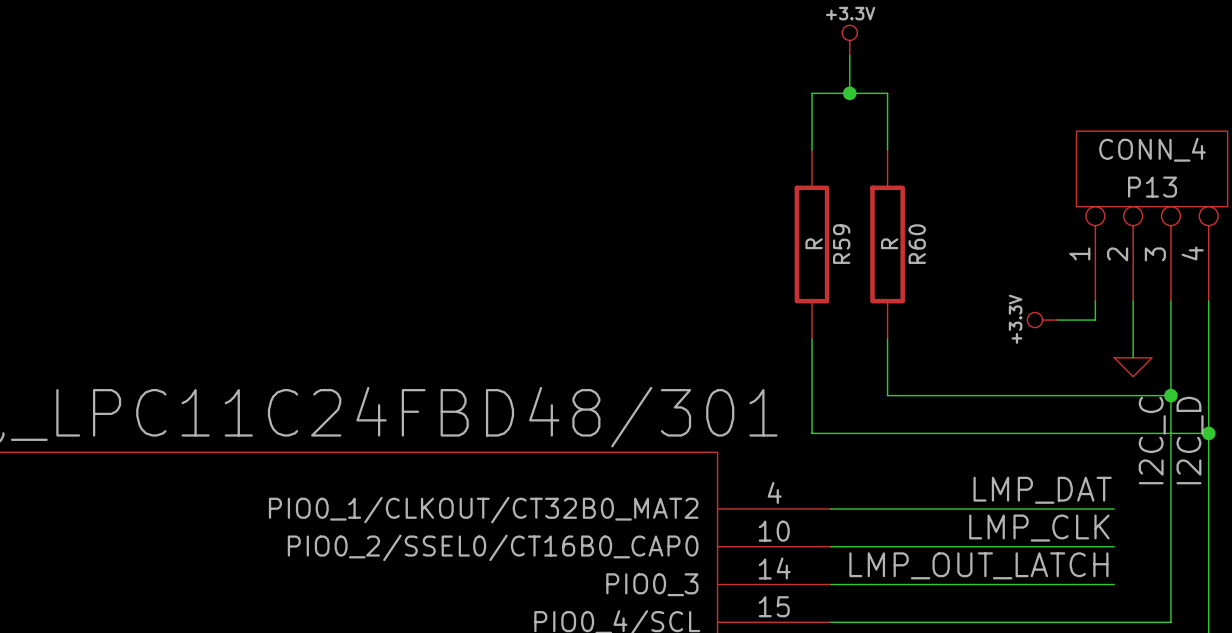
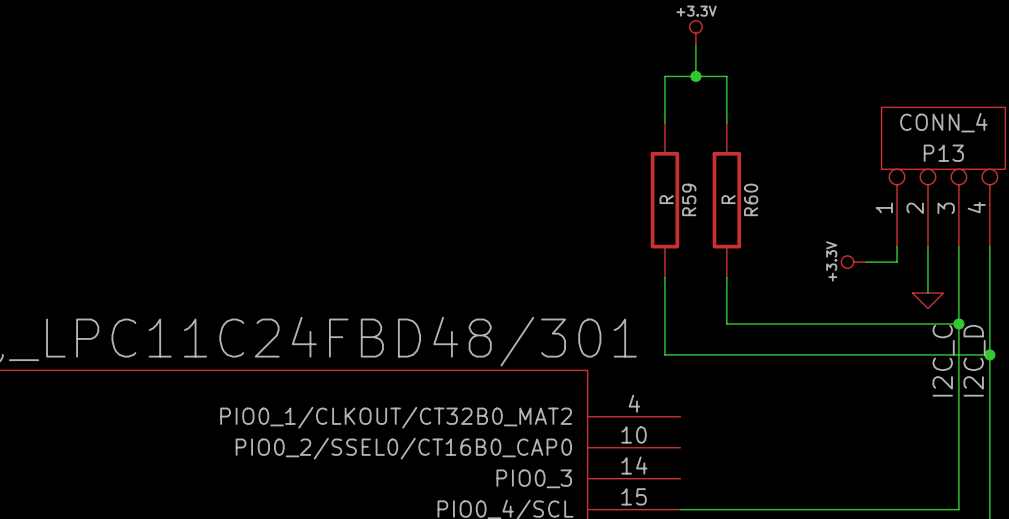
label: LMP_DAT (1042, 490) -> none
wire: (830, 508) (1114, 508) -> none
label: LMP_CLK (1039, 528) -> none
wire: (830, 546) (1114, 546) -> none
label: LMP_OUT_LATCH (978, 565) -> none
wire: (830, 584) (1114, 584) -> none

